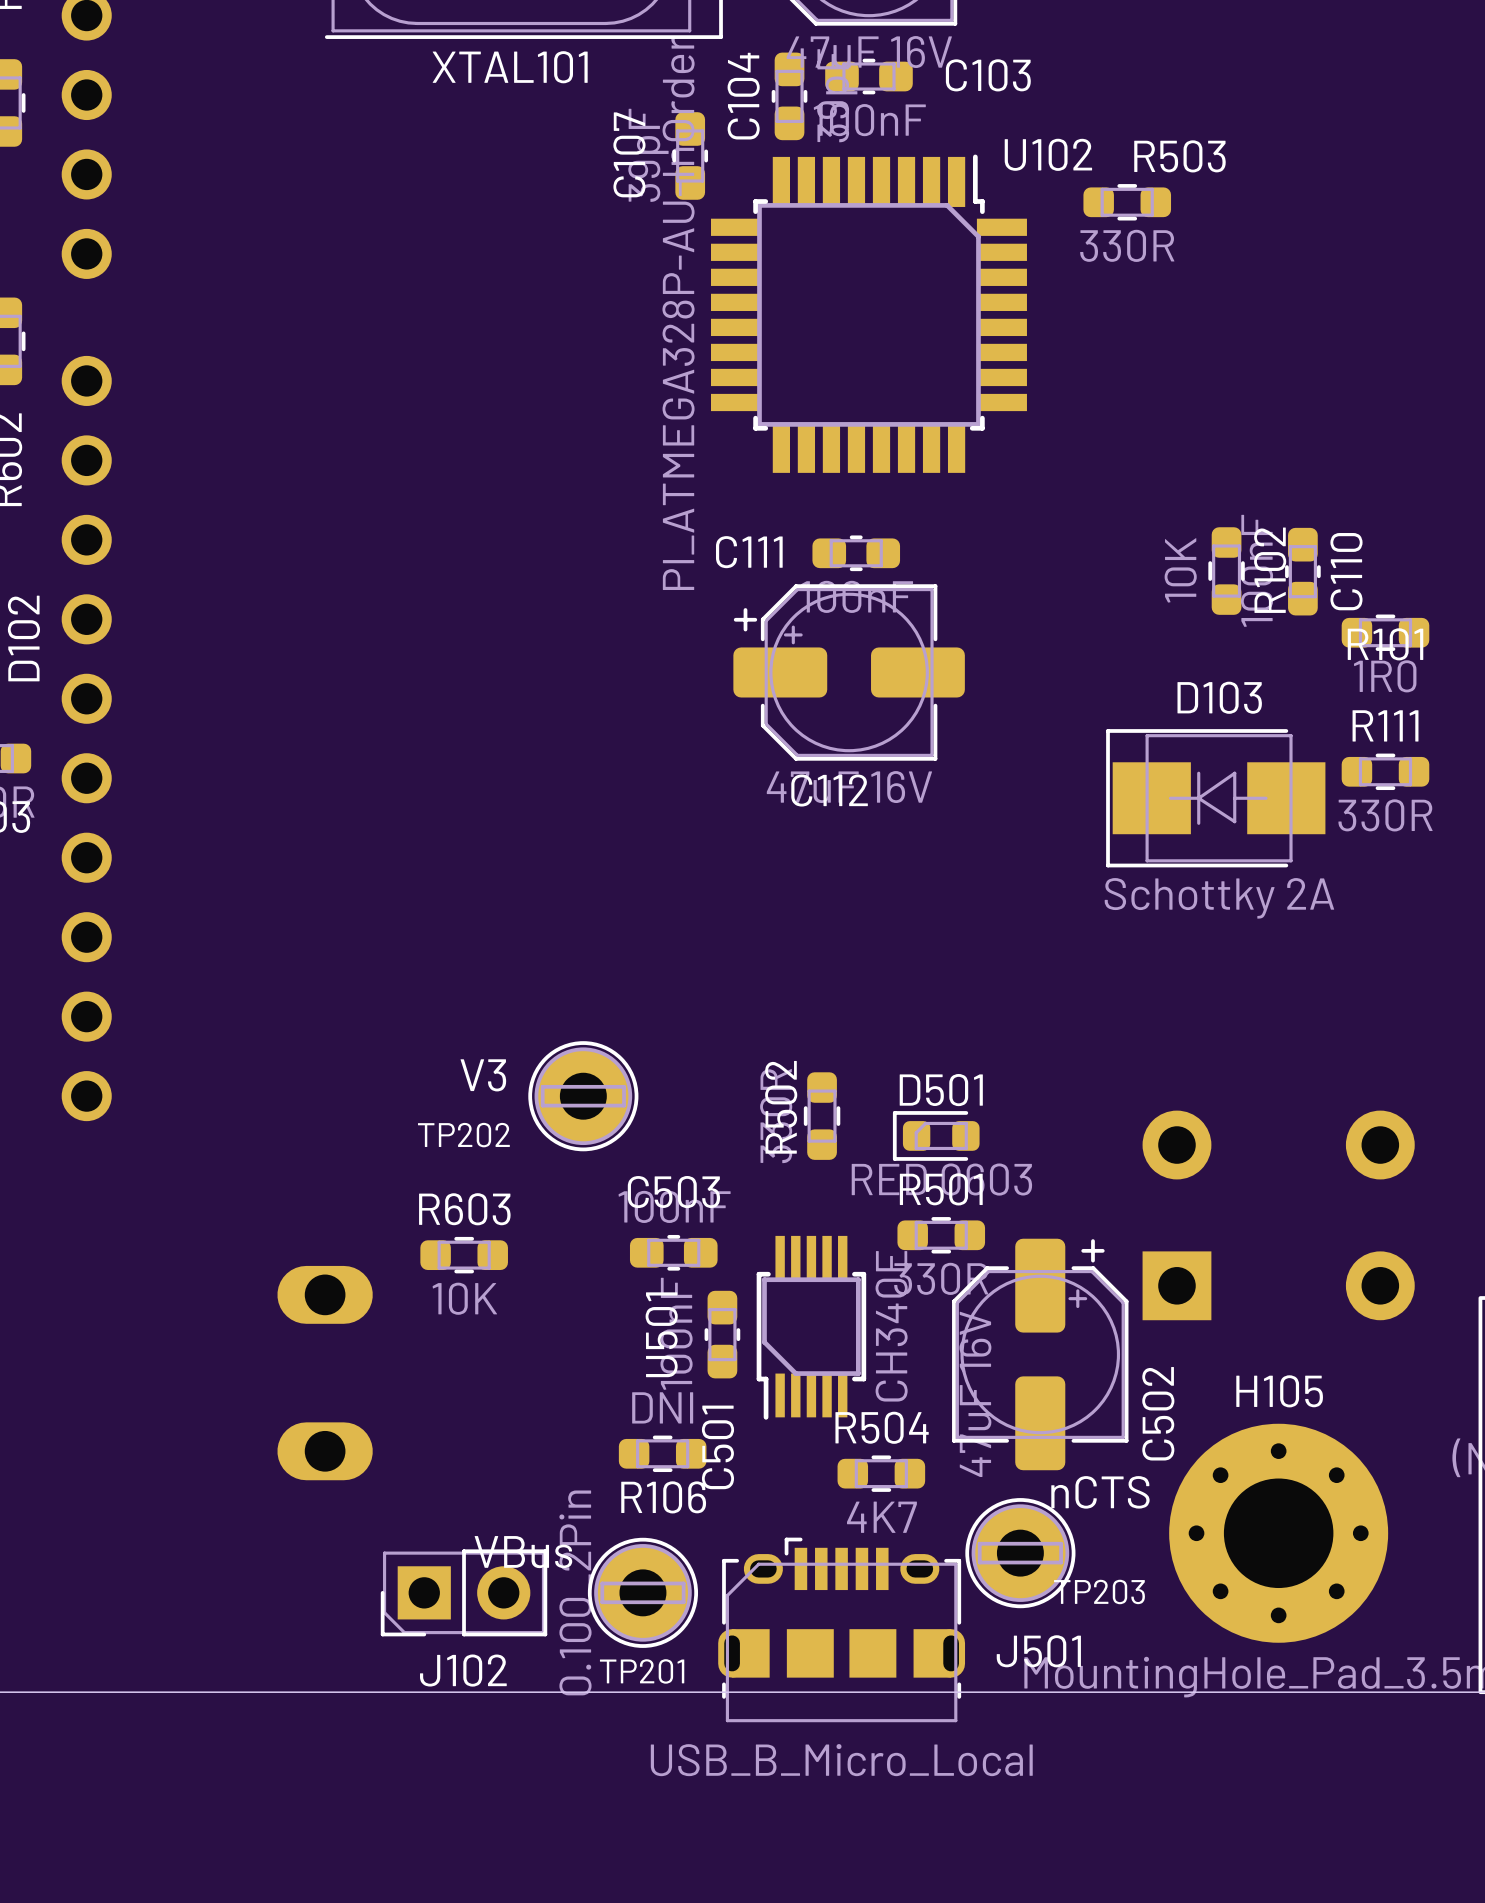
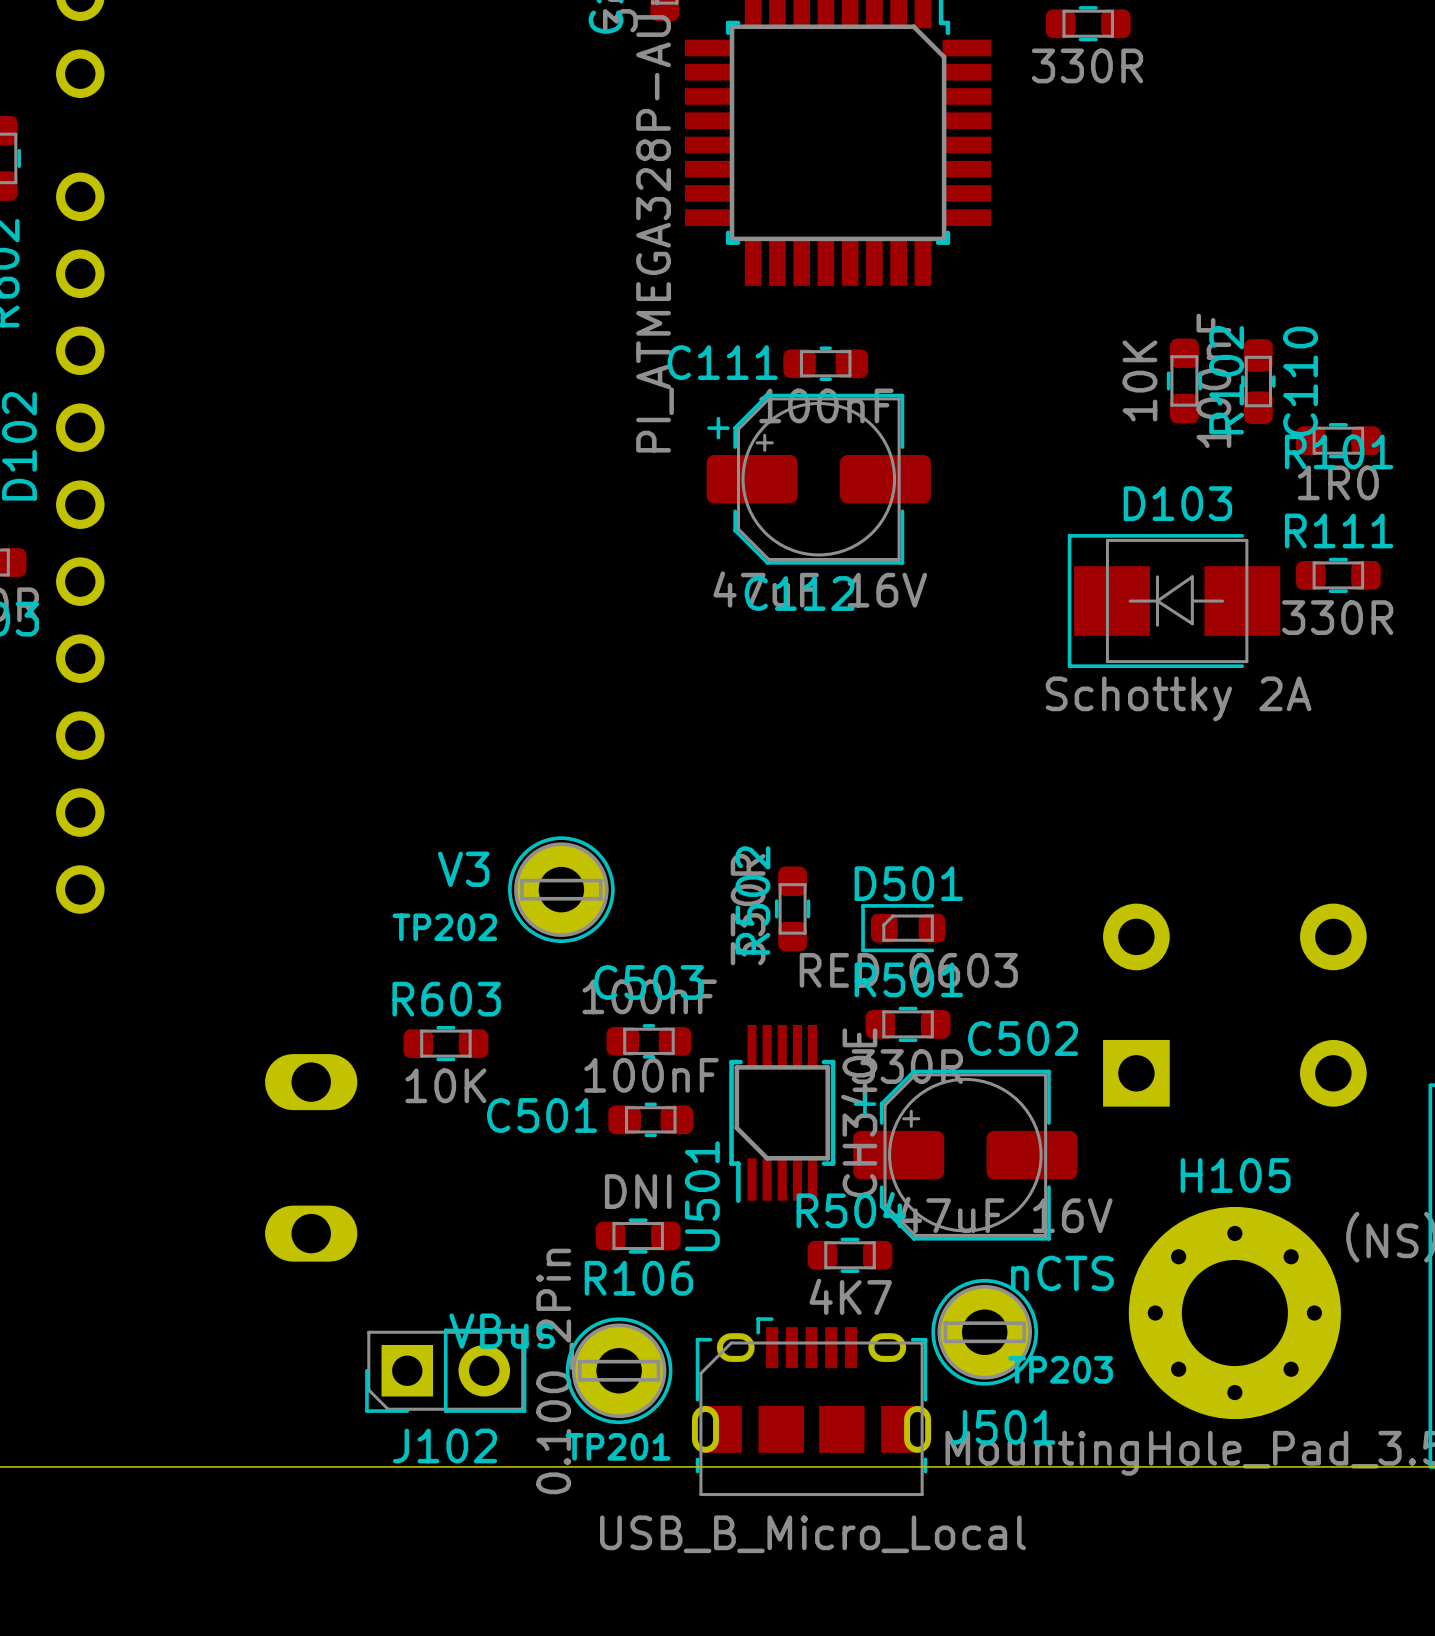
U501 name position: U501 (661, 1334) -> U501 (702, 1196)
C501 rotation: 0° (722, 1334) -> 90° clockwise (650, 1119)
C502 rotation: 0° (1040, 1354) -> 90° counterclockwise (965, 1155)

